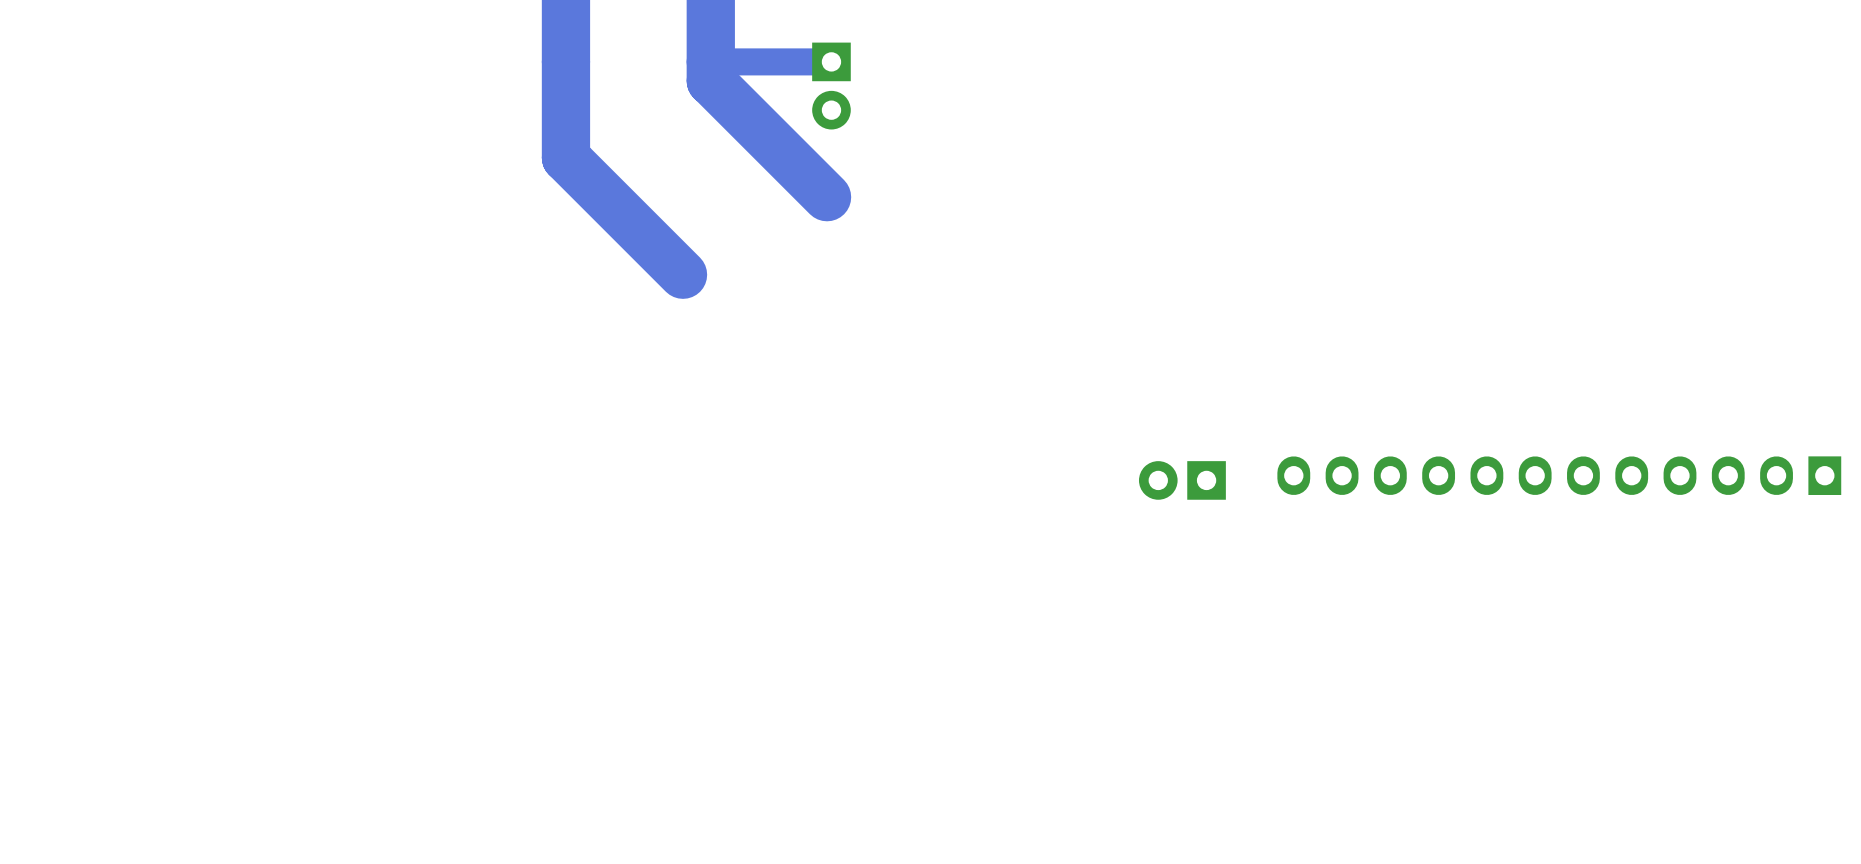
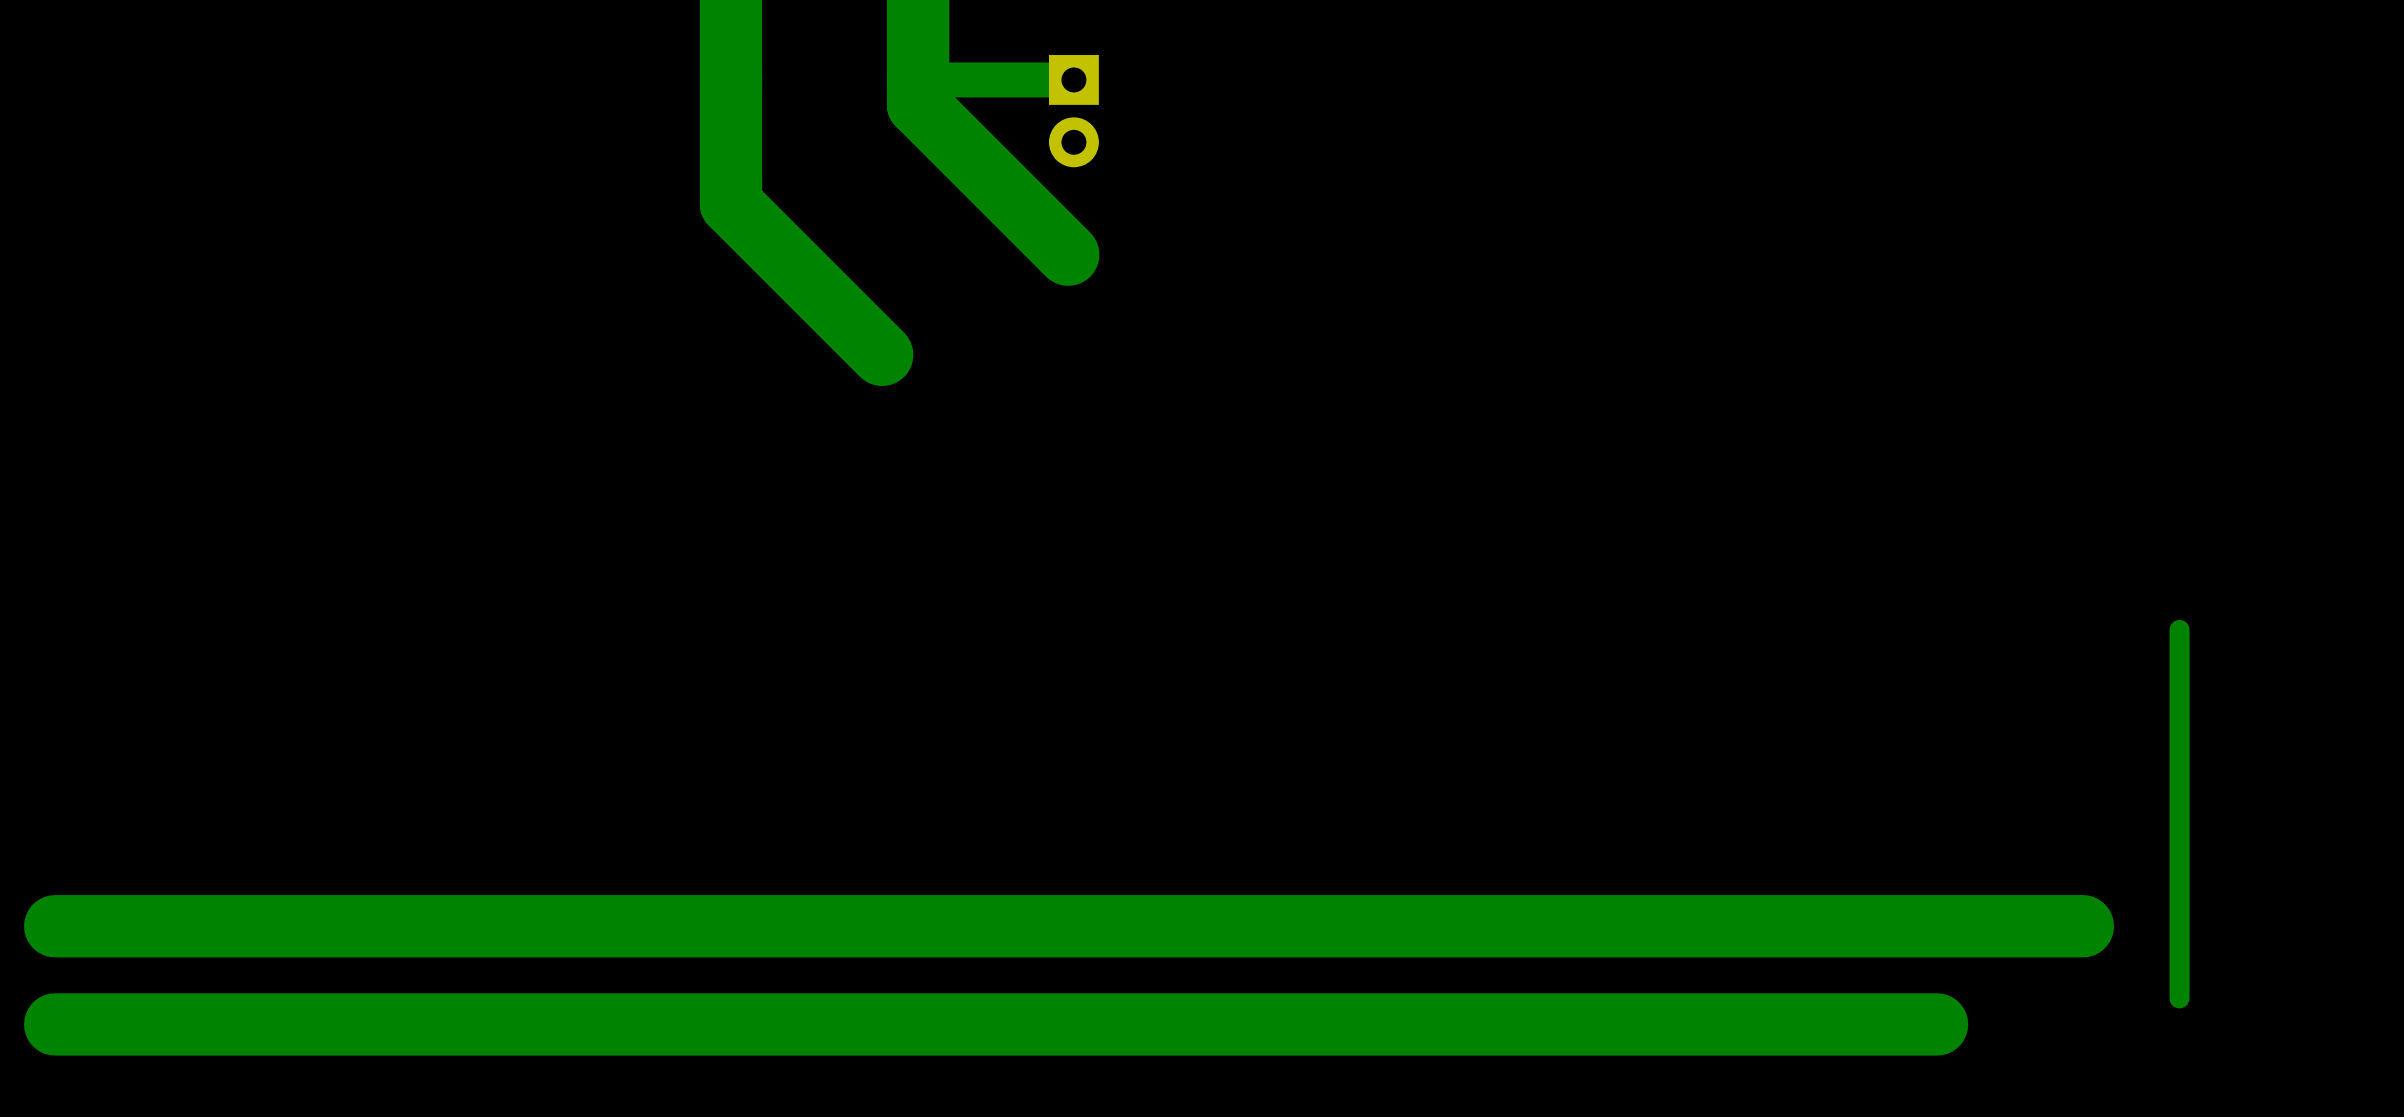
part: (1559, 475) -> none
part: (1182, 480) -> none
track: none -> (2179, 629) (2179, 998)
track: none -> (2082, 926) (55, 926)
track: none -> (1937, 1024) (55, 1024)

